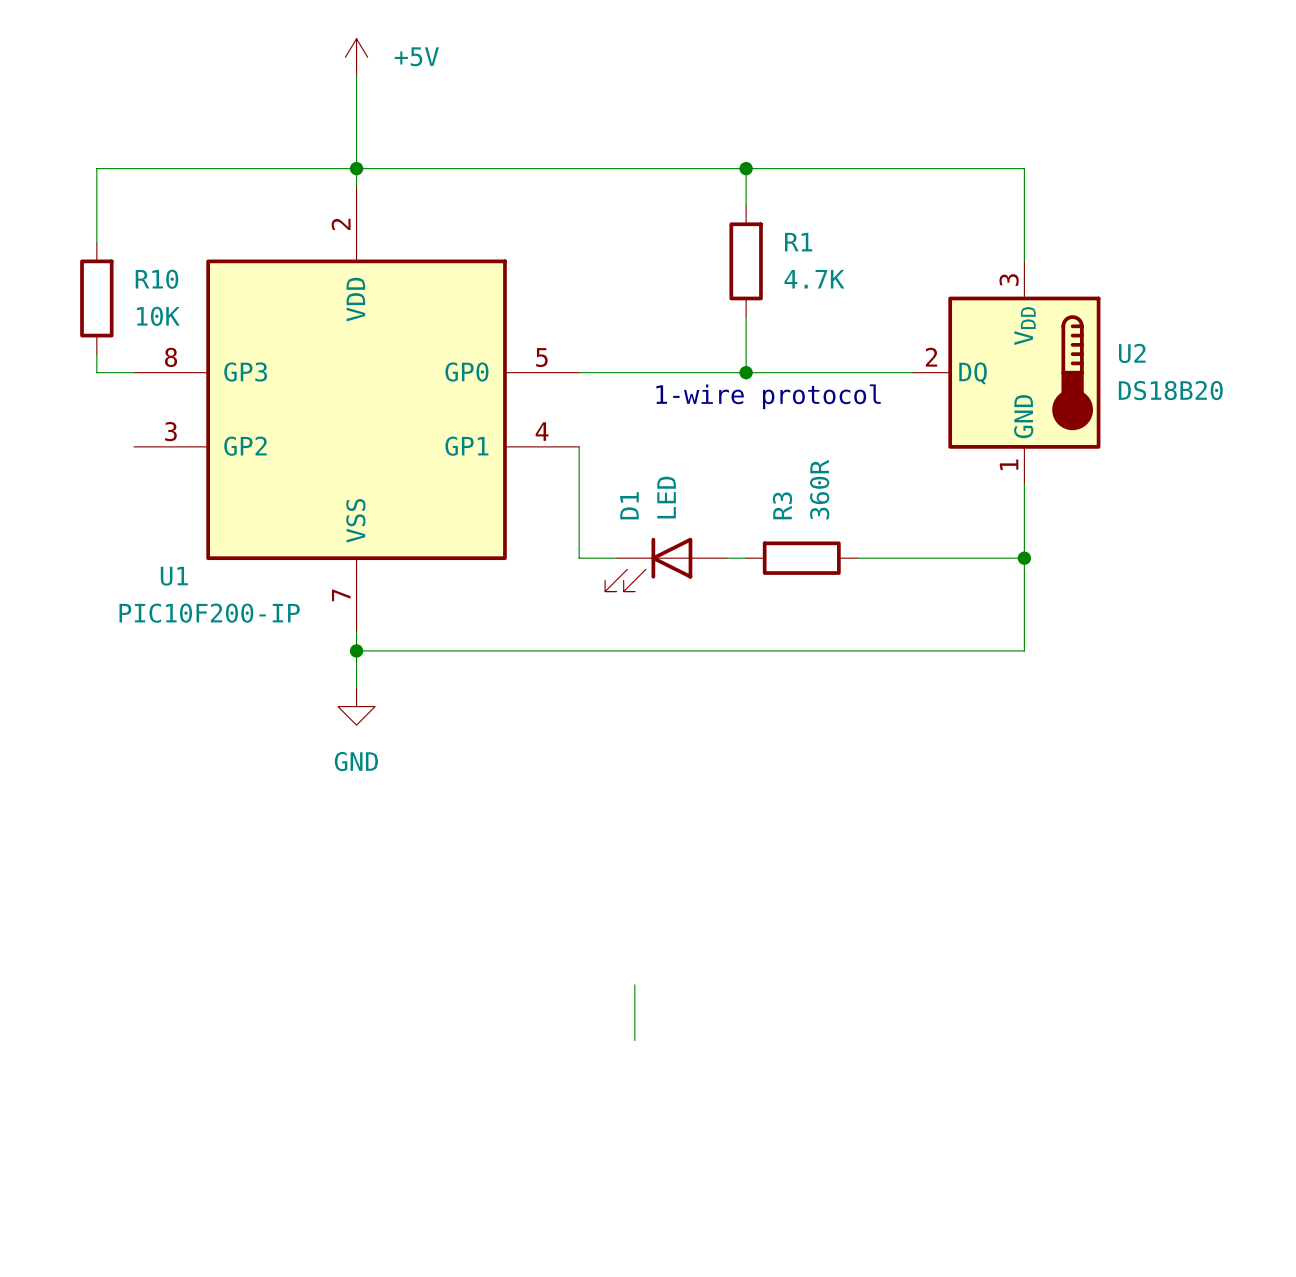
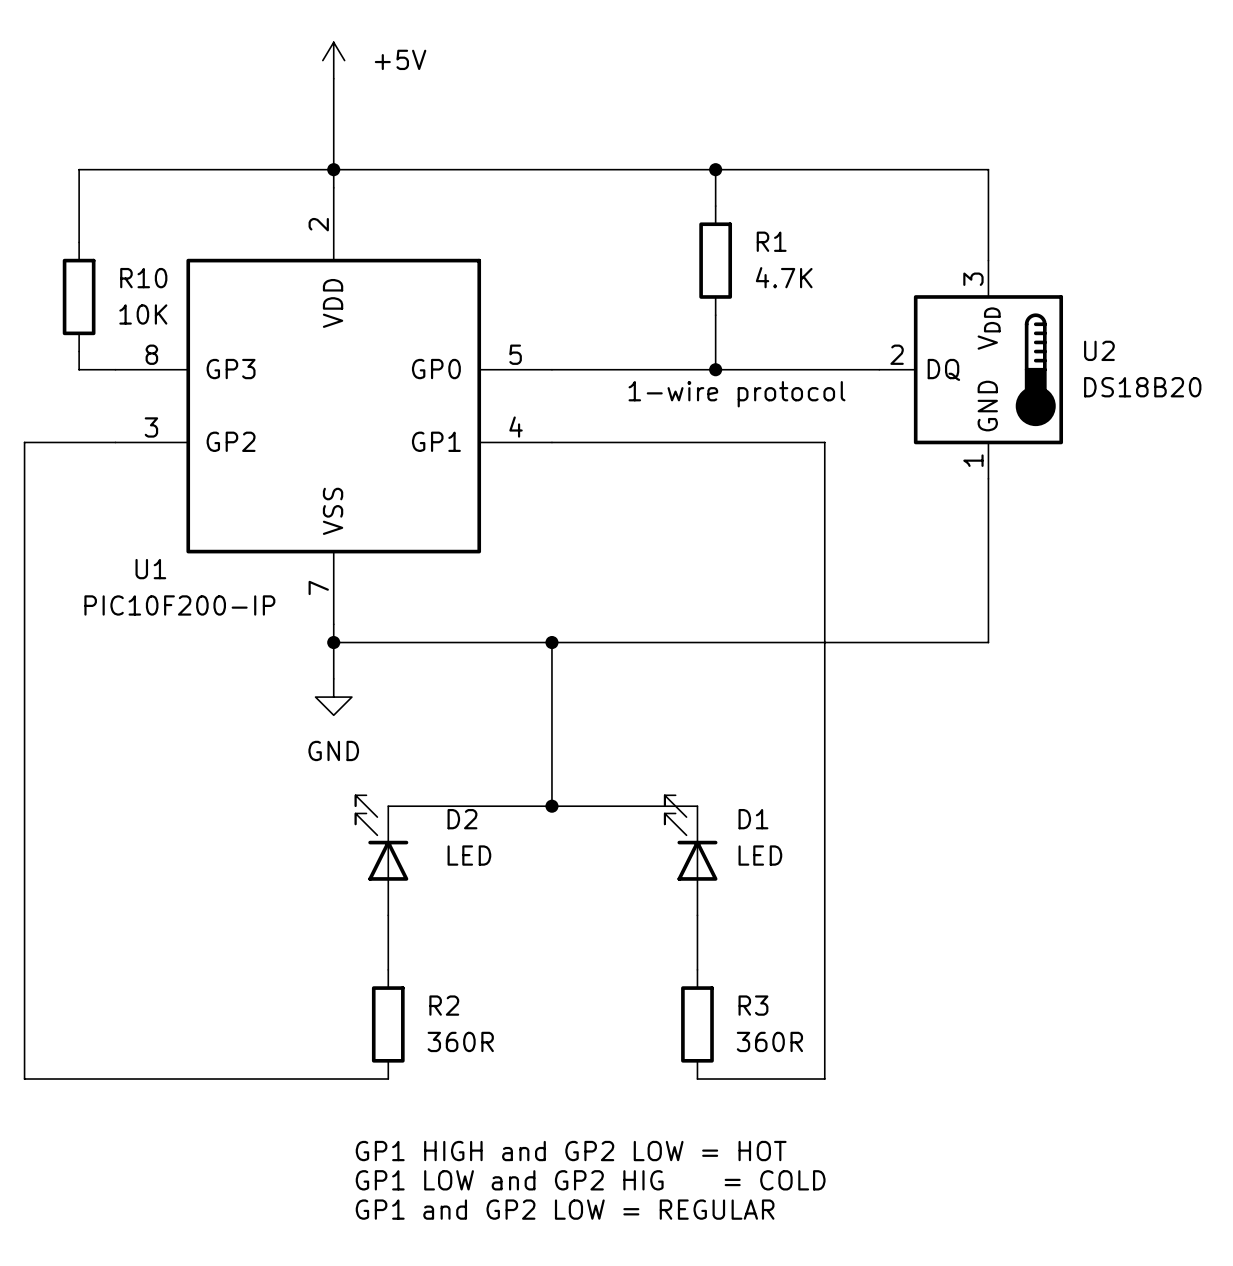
wire: none -> (115, 442) (24, 442) (24, 1079) (388, 1079)
wire: (579, 446) (579, 558) (616, 558) -> (551, 442) (824, 442) (824, 1079) (697, 1079)
wire: (727, 558) (746, 558) -> none
R3 rotation: 0° (801, 558) -> 90° clockwise (697, 1024)
R3 position: (801, 558) -> (697, 1024)
wire: (857, 558) (1024, 558) -> none
junction: (1024, 558) -> none
D1 rotation: 0° (648, 564) -> 90° clockwise (691, 838)
D1 position: (666, 564) -> (691, 855)
wire: none -> (551, 642) (551, 806)
junction: none -> (551, 642)
wire: none -> (388, 806) (697, 806)
junction: none -> (551, 806)
D2: none -> LED (381, 855)
wire: none -> (388, 915) (388, 969)
wire: (634, 984) (634, 1040) -> (697, 915) (697, 969)
R2: none -> 360R (388, 1024)
text: none -> GP1 HIGH and GP2 LOW = HOT (571, 1151)
text: none -> GP1 LOW and GP2 HIG = COLD (590, 1180)
text: none -> GP1 and GP2 LOW = REGULAR (565, 1209)

